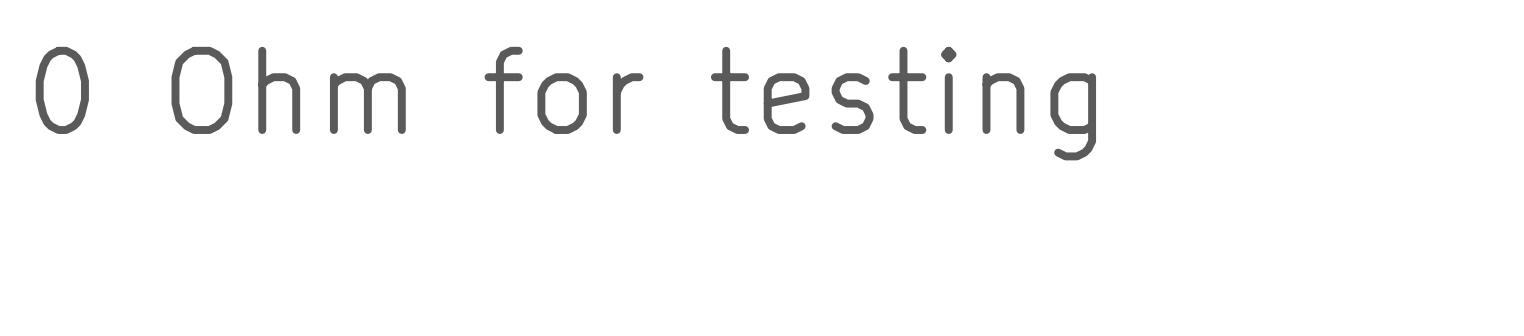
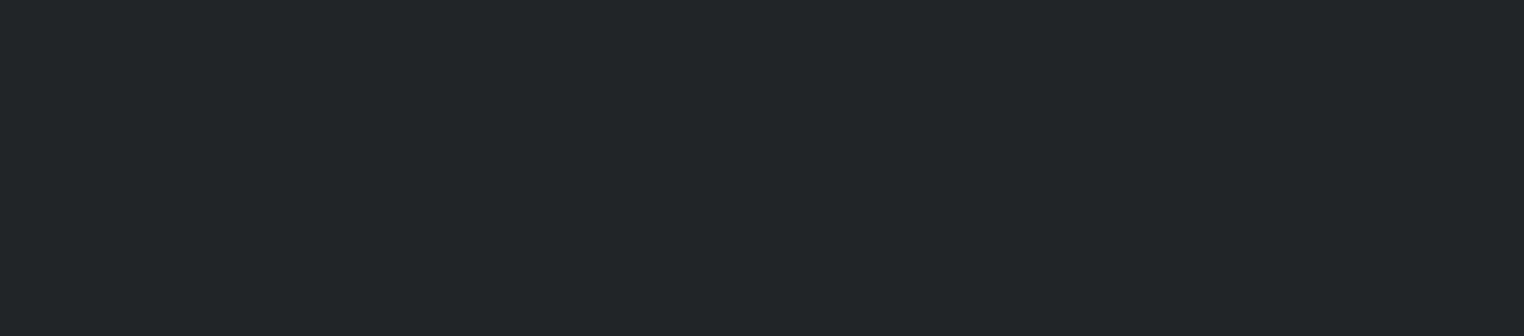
text: 0 Ohm for testing (565, 103) -> none

